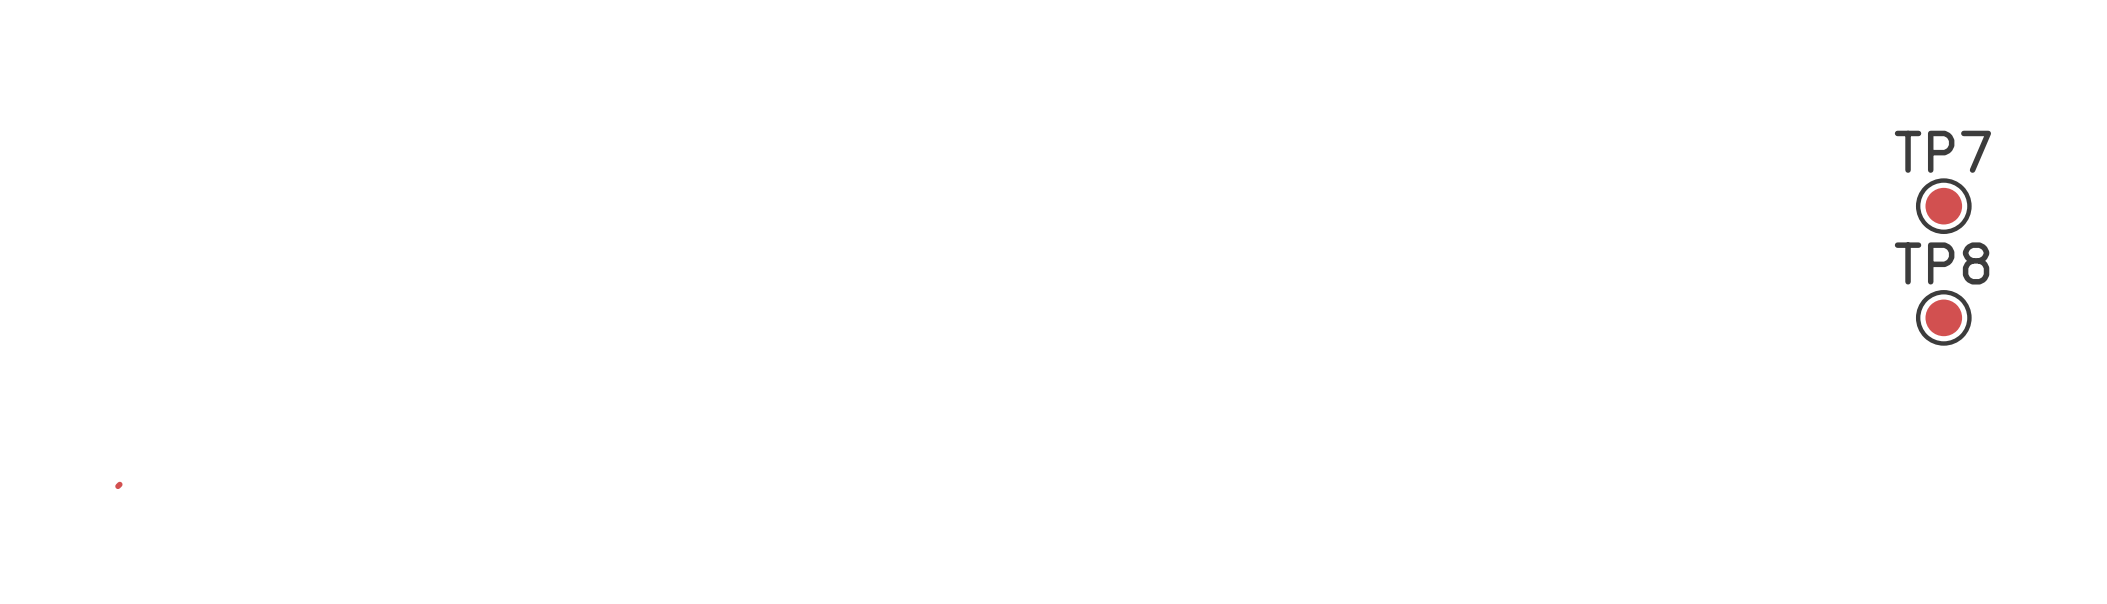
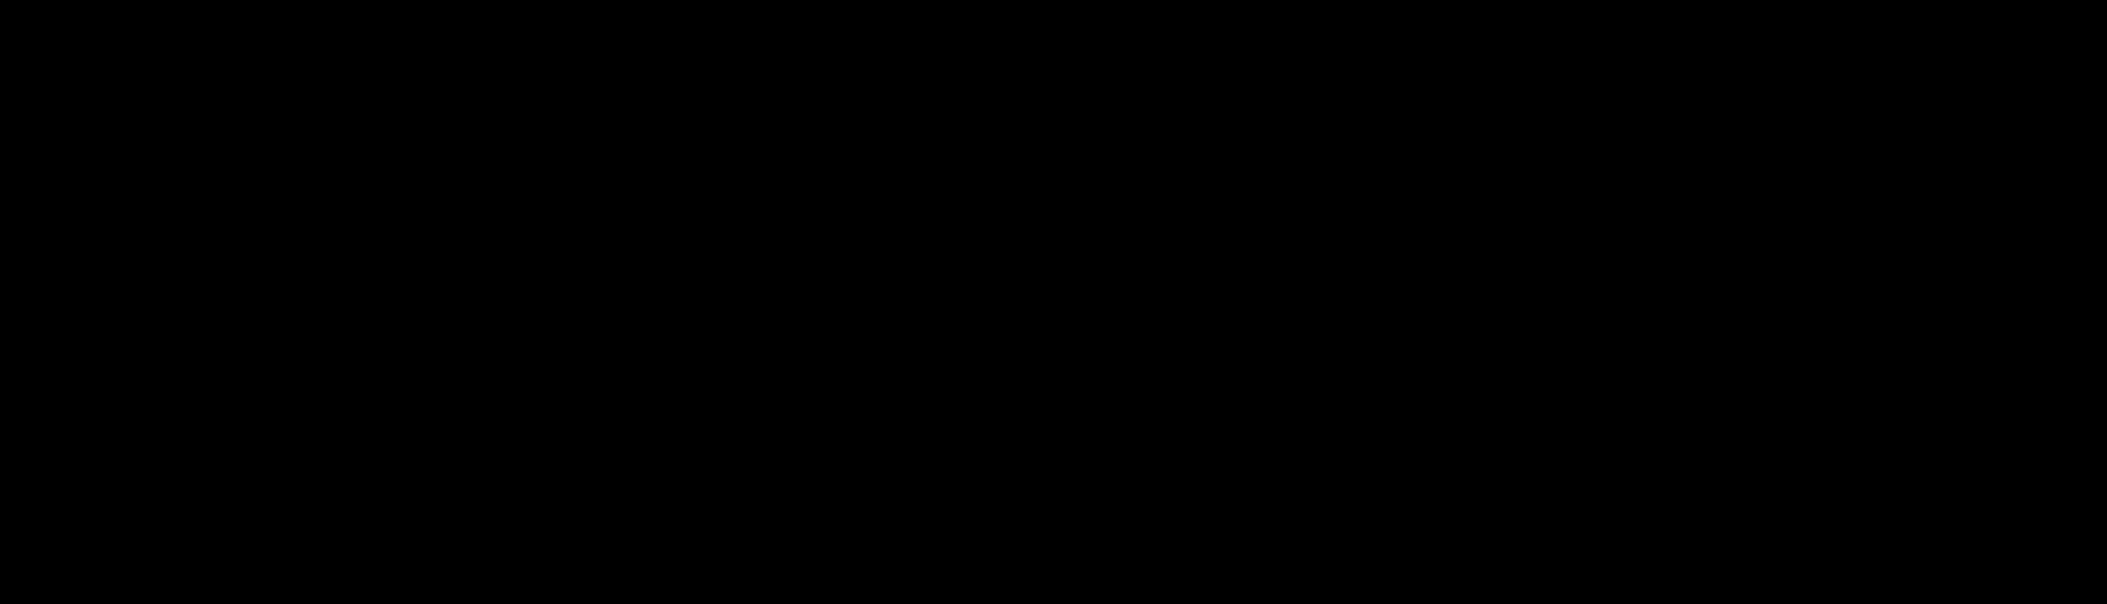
TP7: (1943, 206) -> none
TP8: (1943, 317) -> none
top track: (119, 484) (117, 486) -> none

